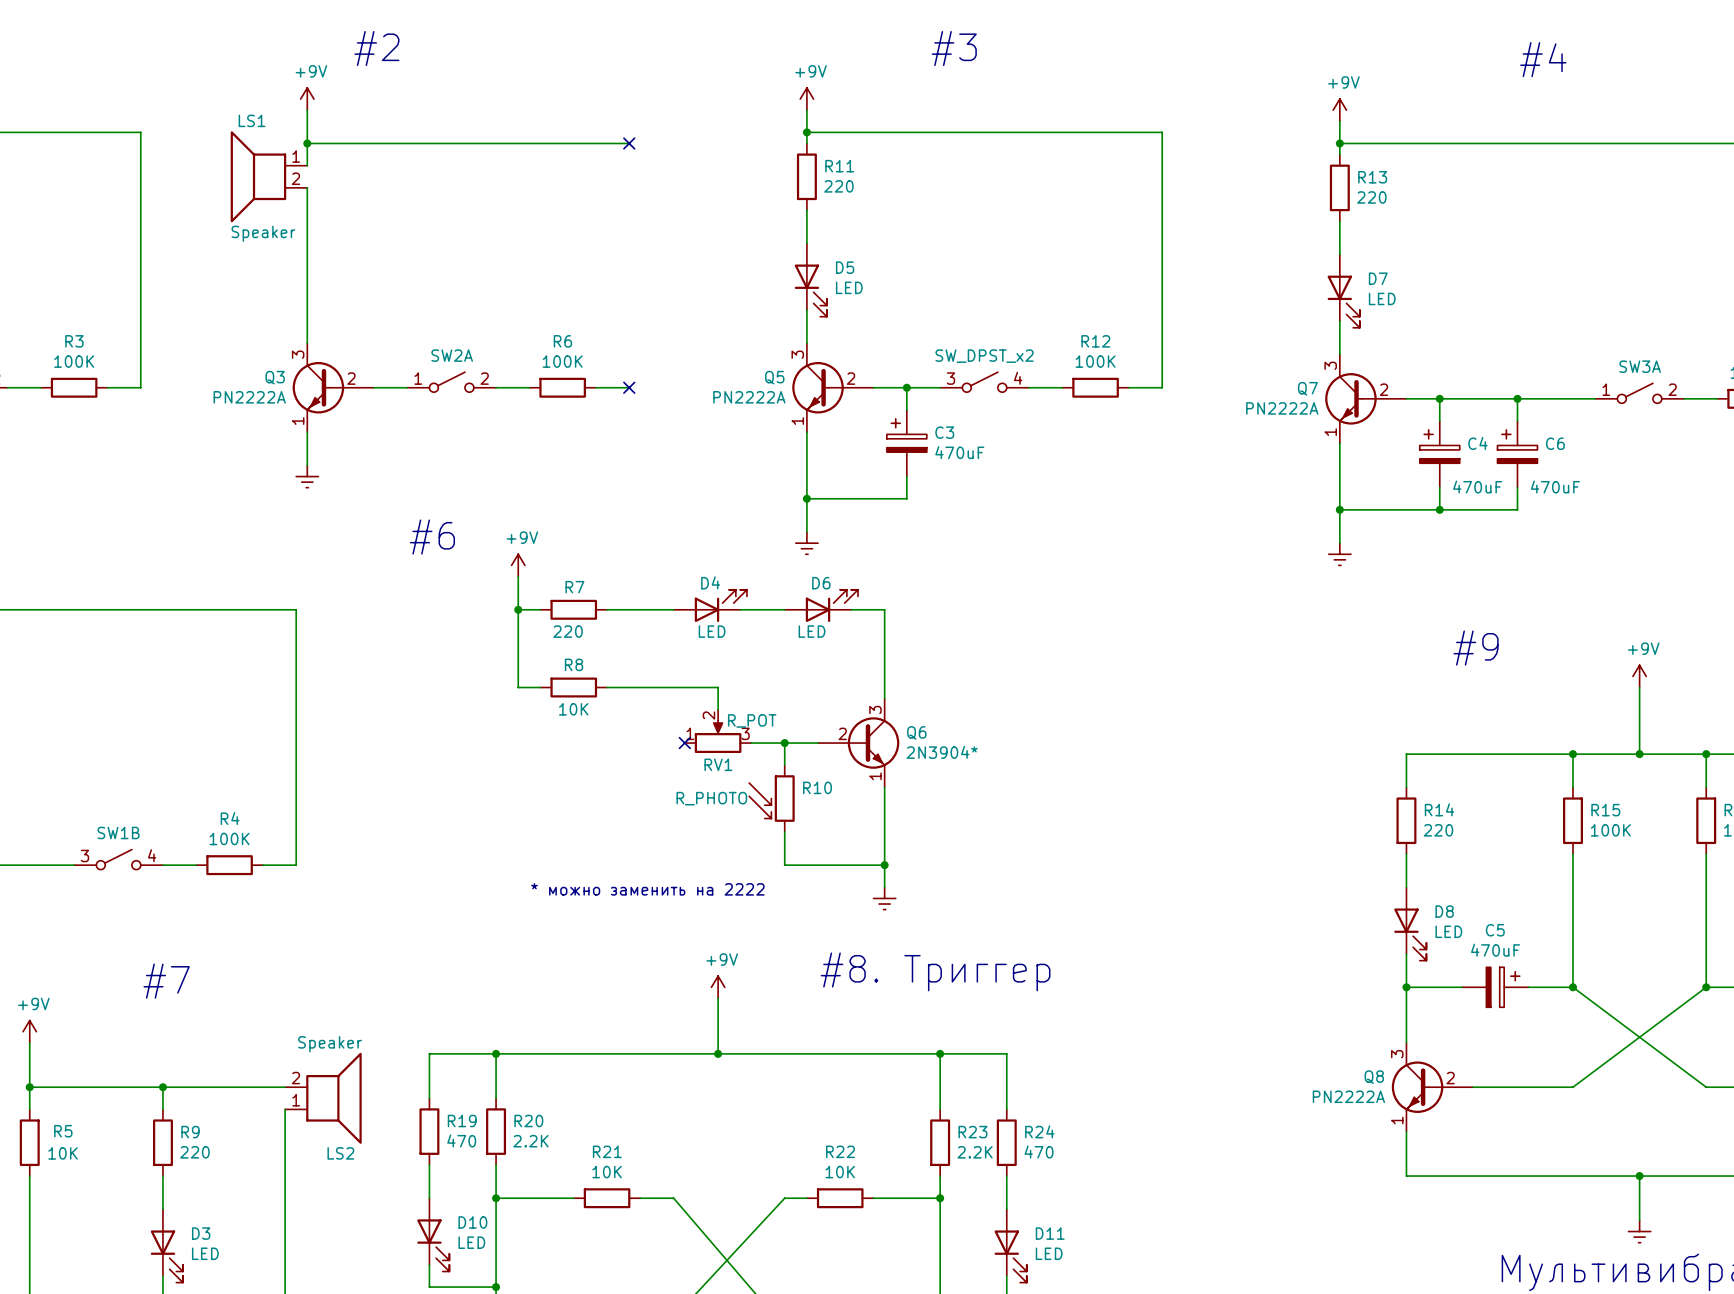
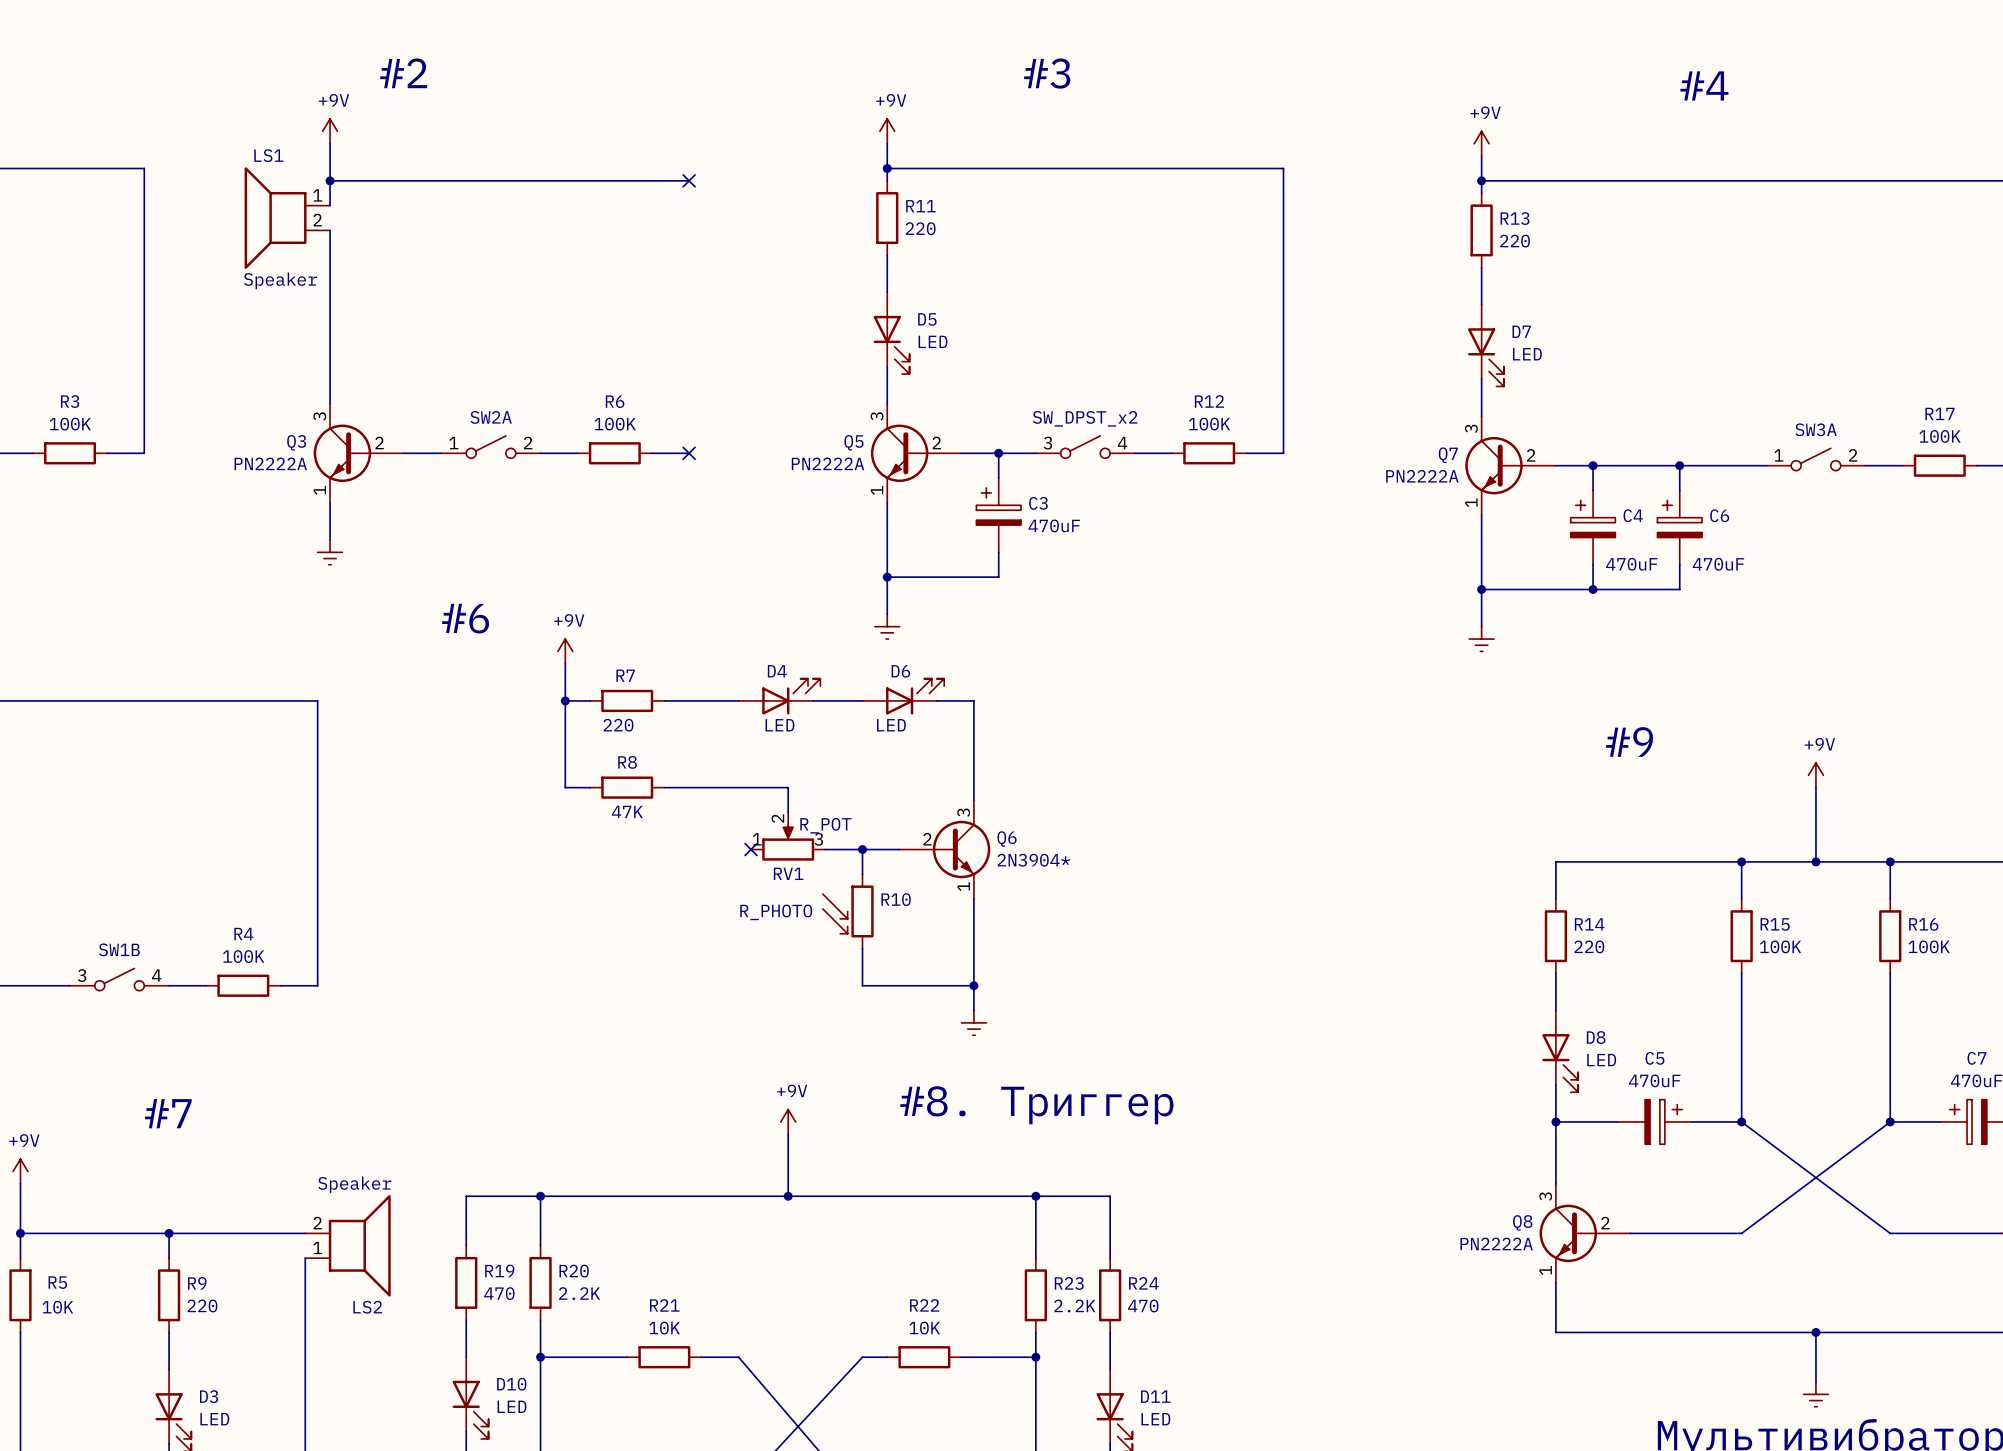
R8 value: 10K (573, 709) -> 47K (627, 811)
text: * можно заменить на 2222 (647, 889) -> none

